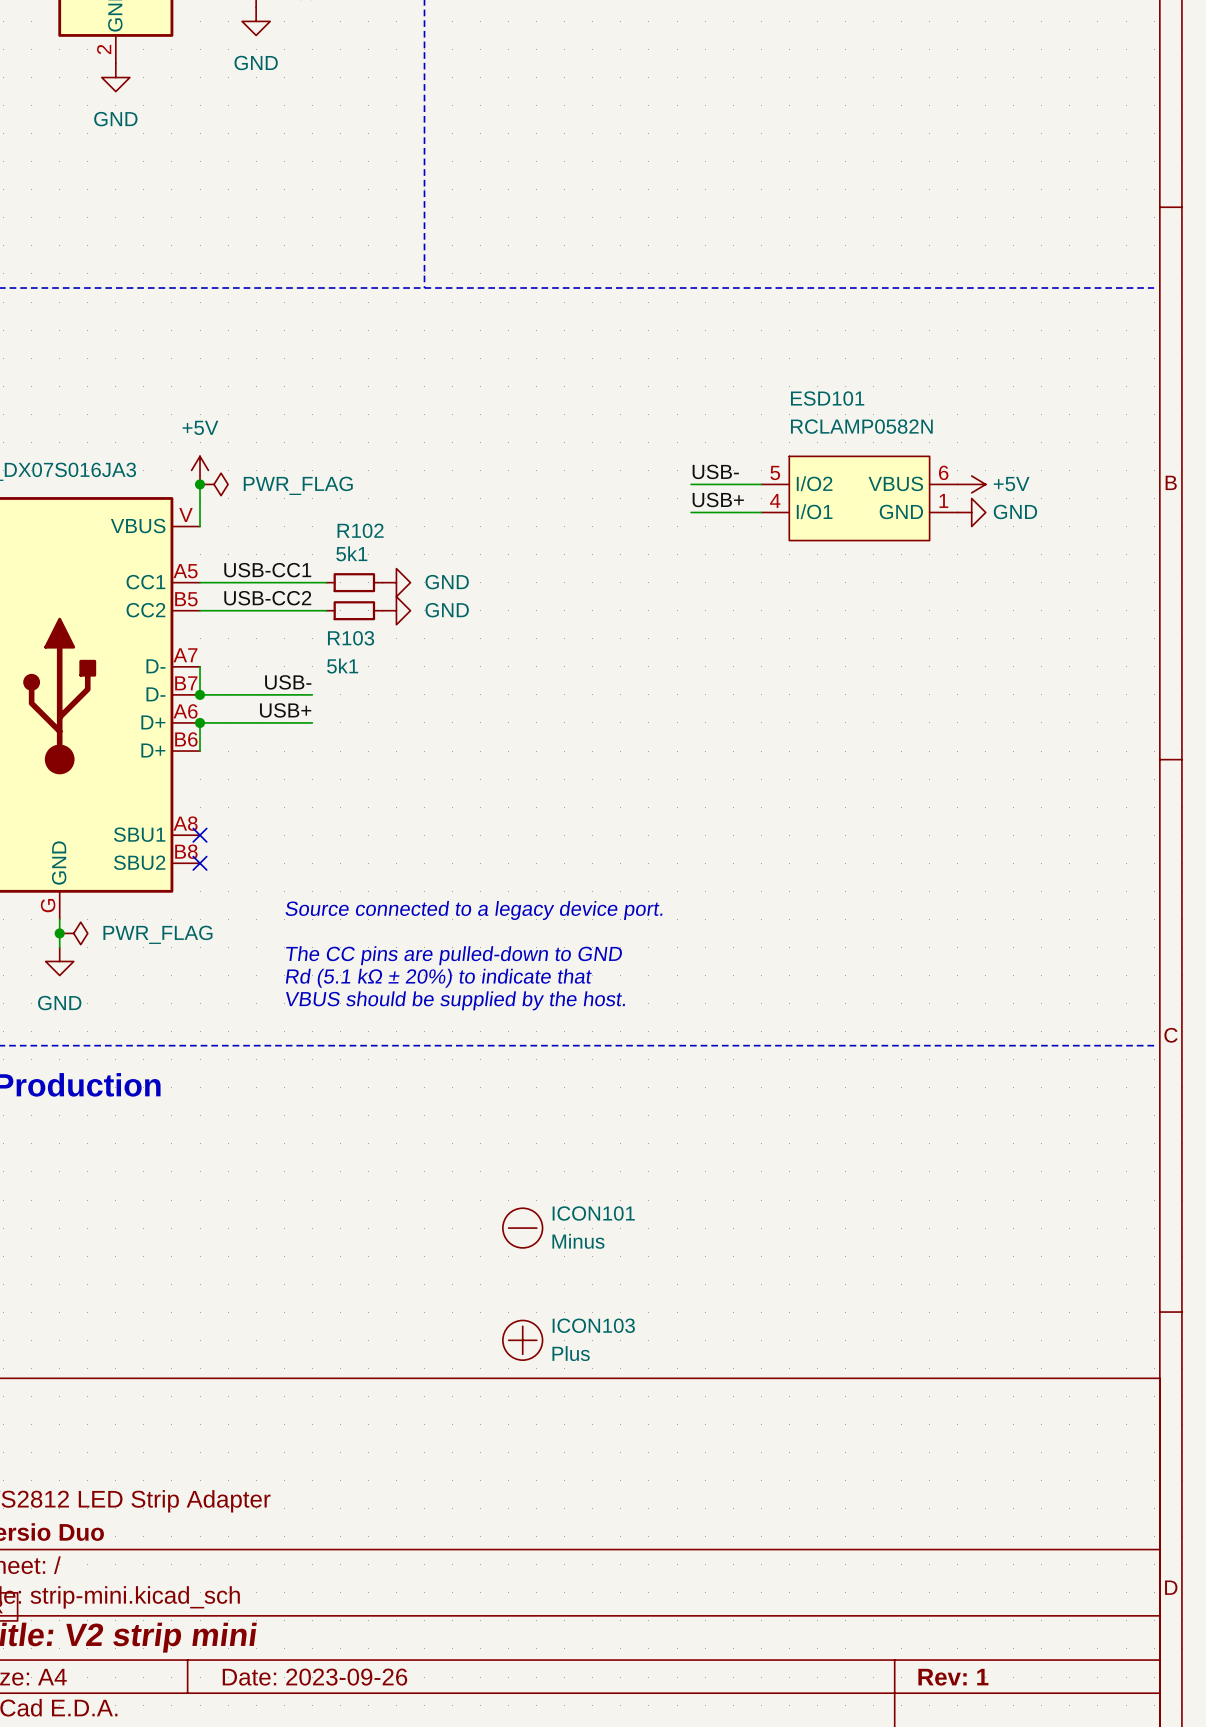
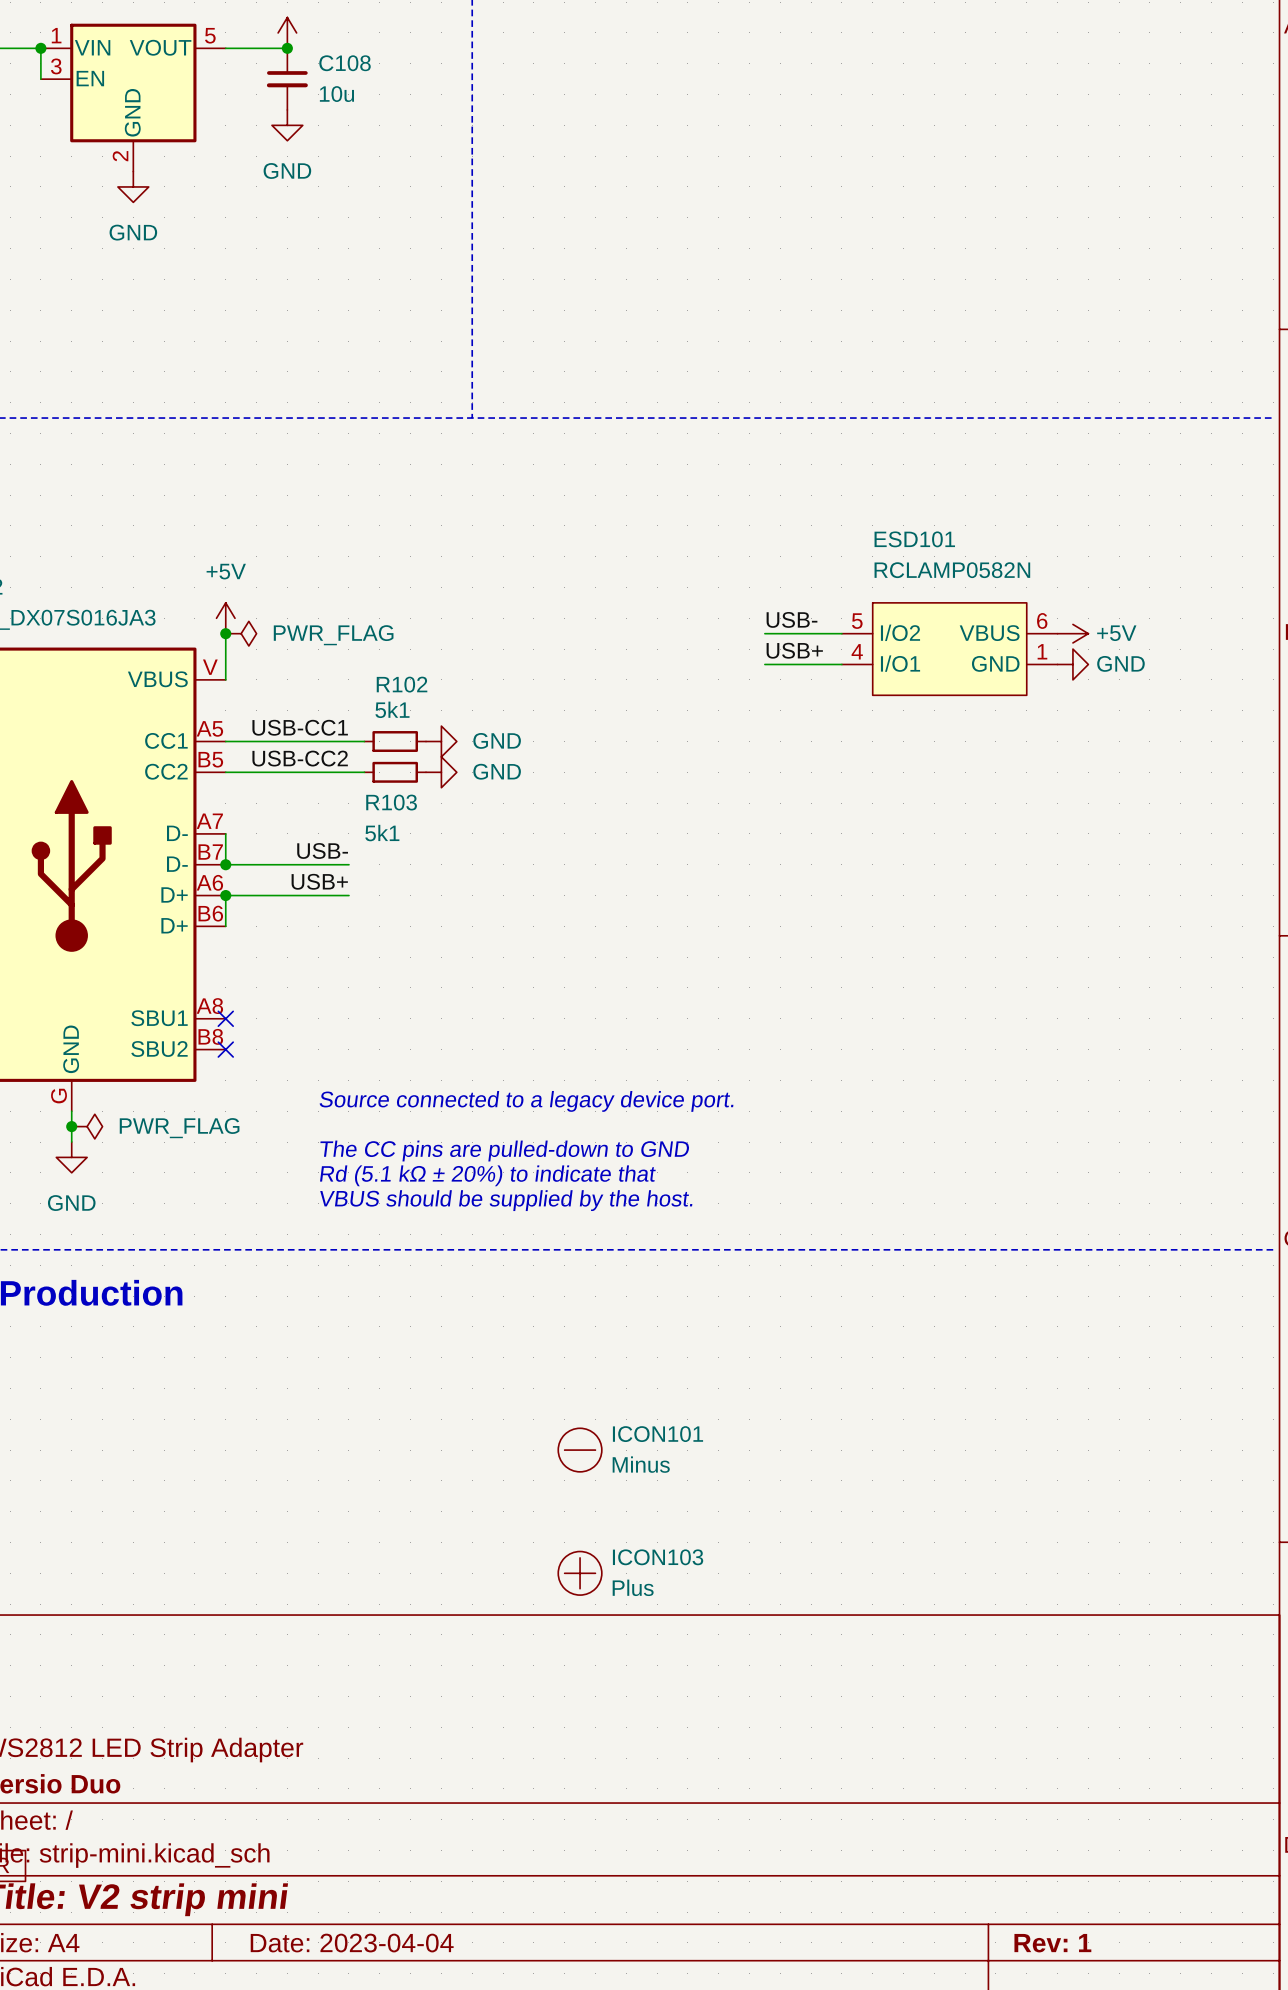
title block: Date: 2023-09-26 (314, 1677) -> Date: 2023-04-04 (352, 1943)

